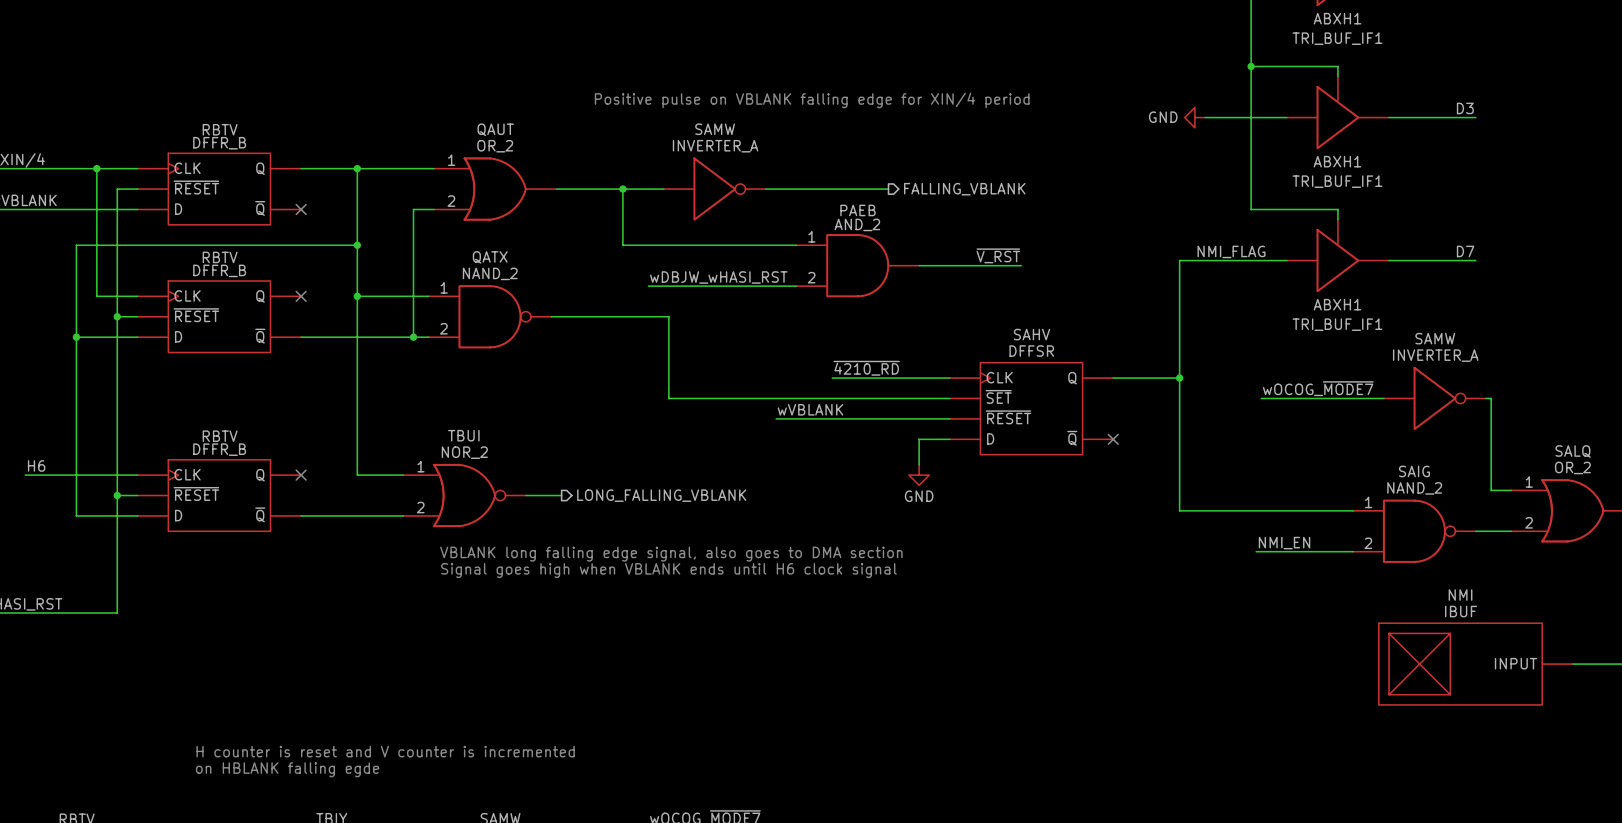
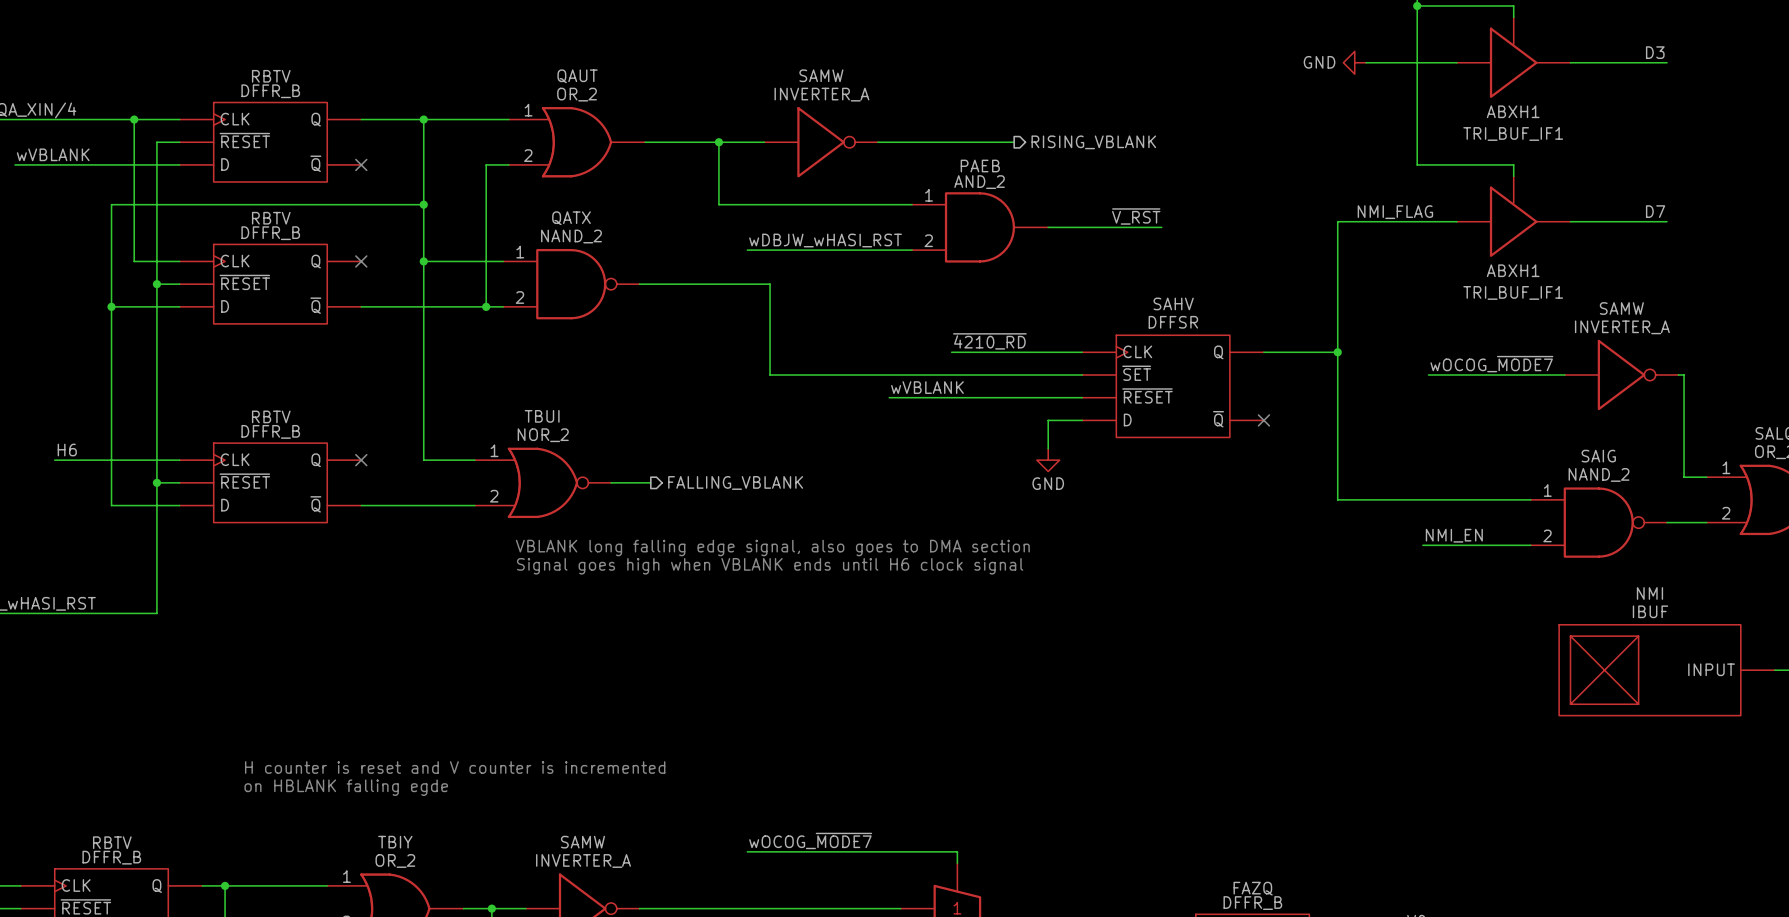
text: Positive pulse on VBLANK falling edge for XIN/4 period (812, 100) -> none
hierarchical label: FALLING_VBLANK (964, 189) -> RISING_VBLANK (1093, 142)
hierarchical label: LONG_FALLING_VBLANK (661, 495) -> FALLING_VBLANK (735, 482)

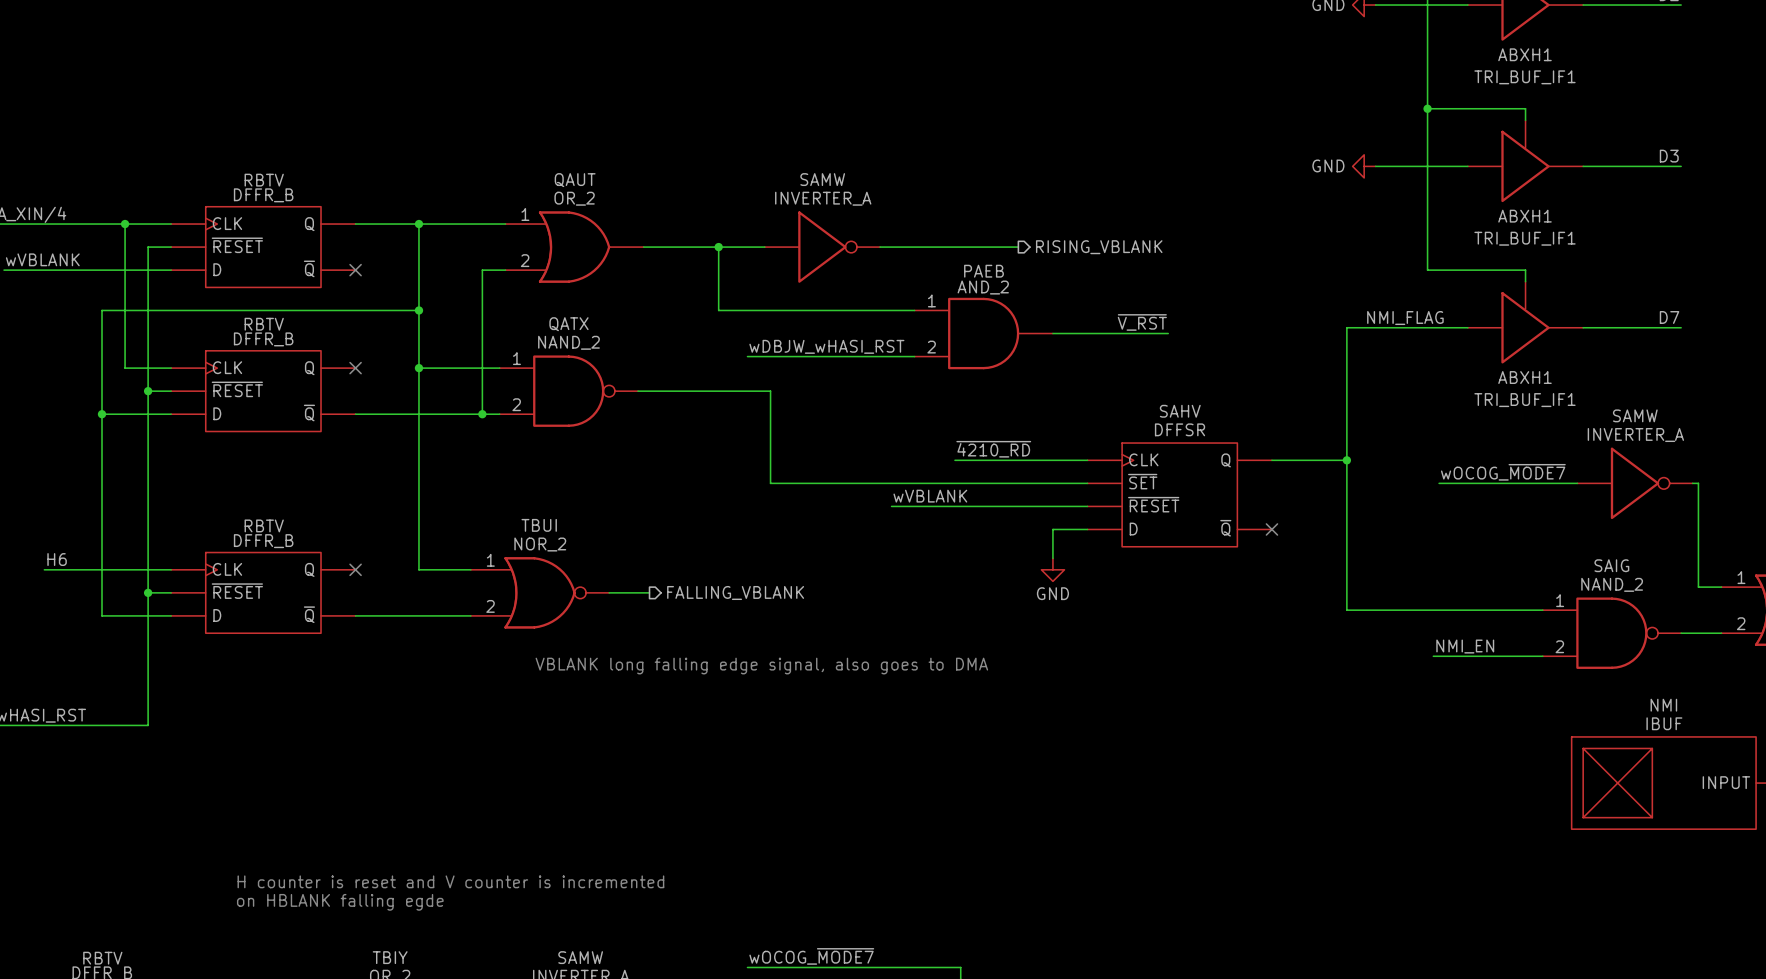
text: VBLANK long falling edge signal, also goes to DMA section (772, 548) -> VBLANK long falling edge signal, also goes to DMA (761, 666)
text: Signal goes high when VBLANK ends until H6 clock signal (770, 566) -> none

